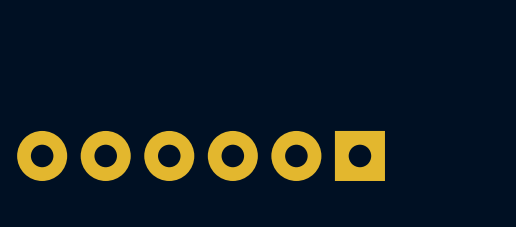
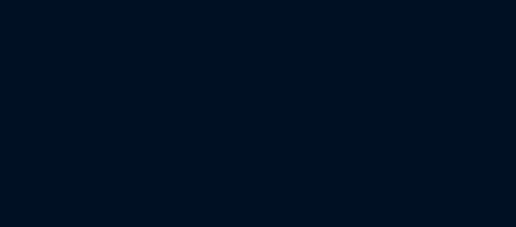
part: (201, 155) -> none

